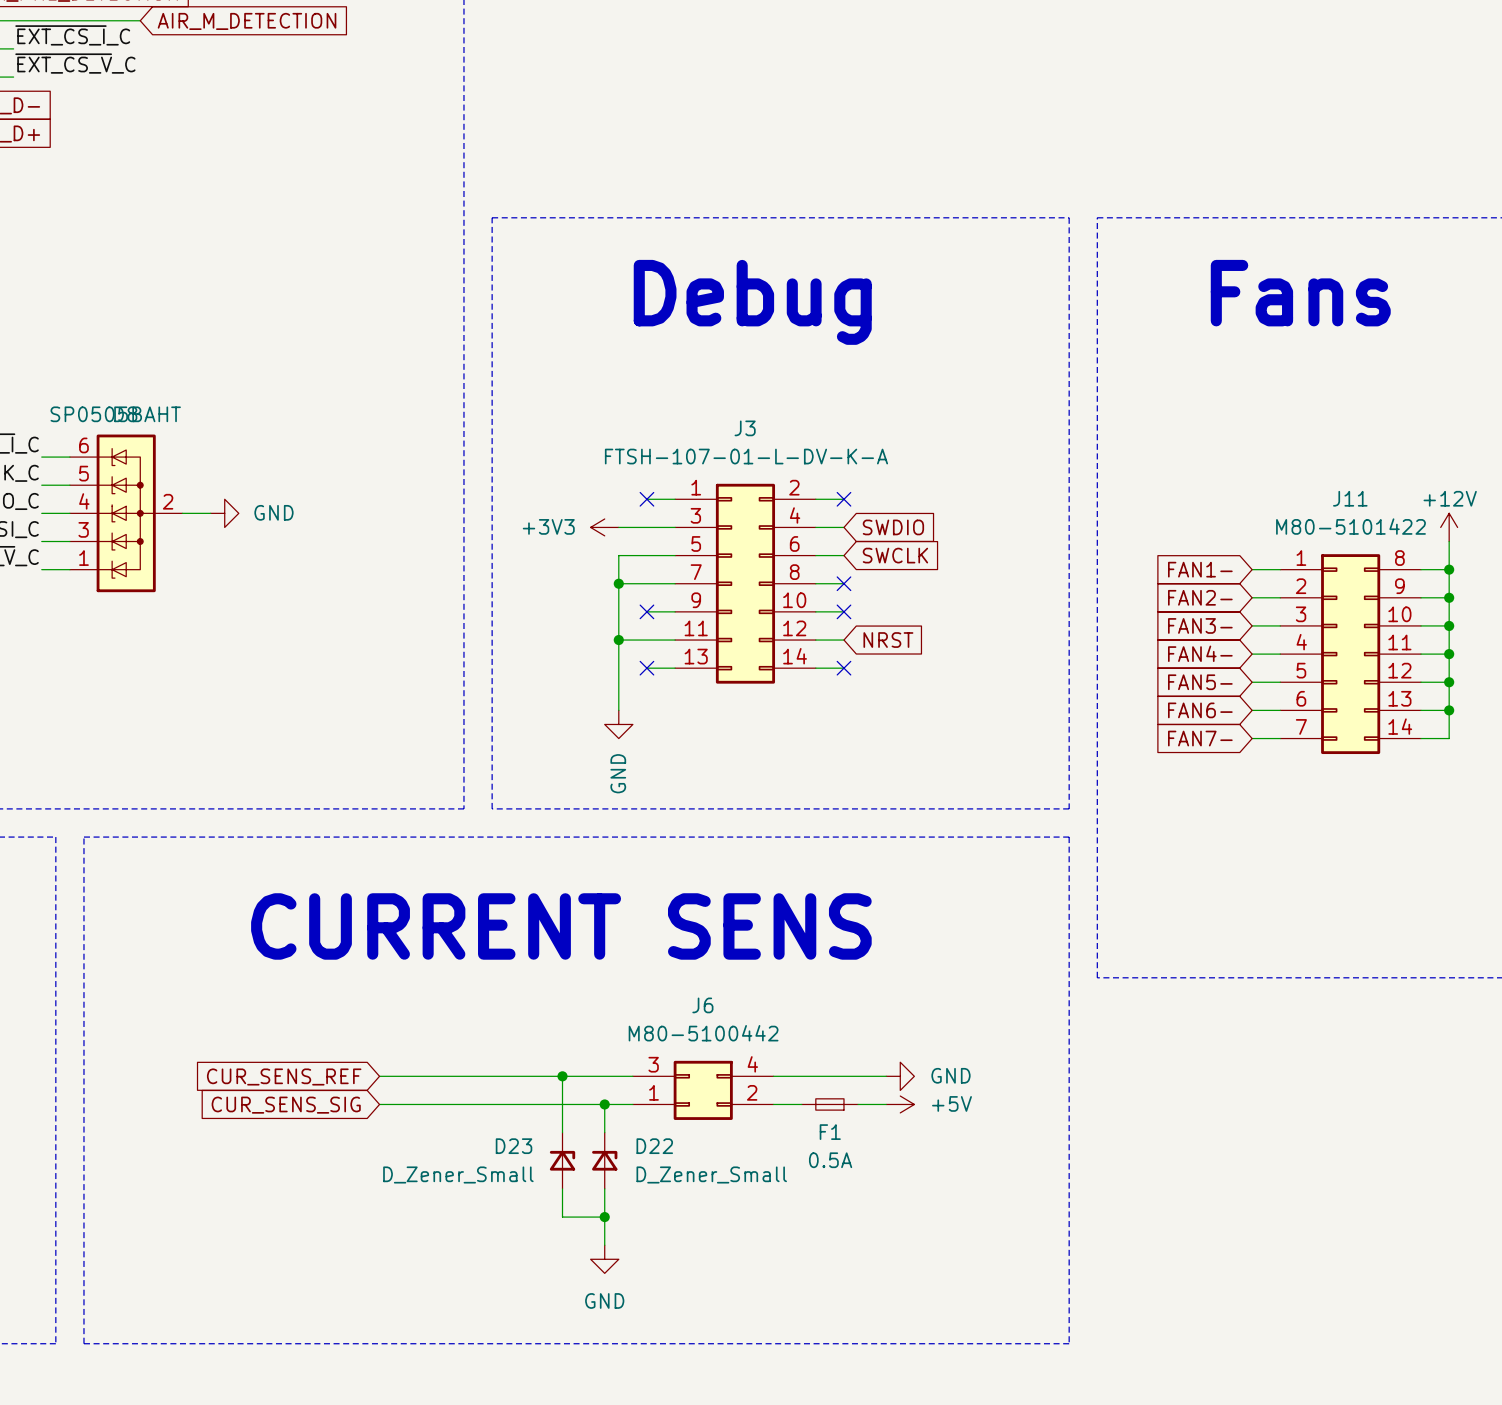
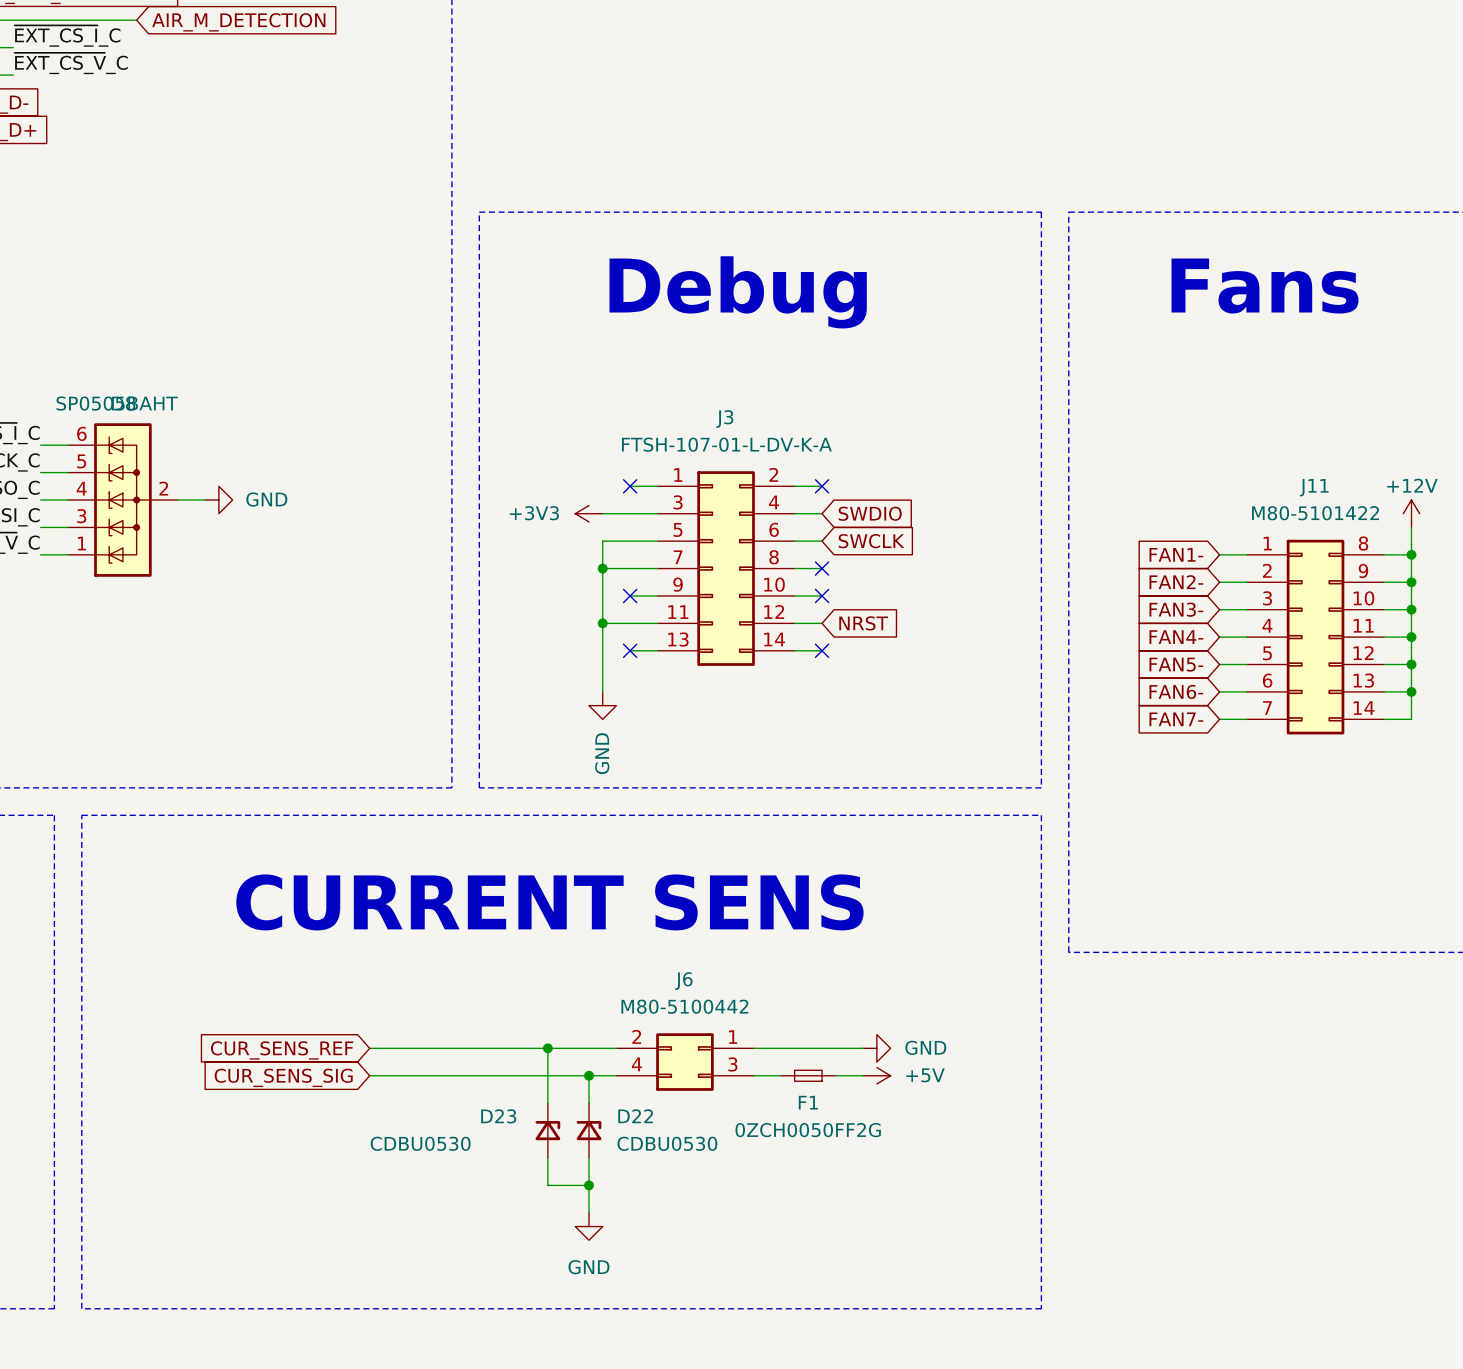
J6 rotation: 0° (703, 1090) -> 180° (684, 1062)
F1 value: 0.5A (830, 1160) -> 0ZCH0050FF2G (808, 1130)
D23 value: D_Zener_Small (458, 1174) -> CDBU0530 (420, 1143)
D22 value: D_Zener_Small (711, 1174) -> CDBU0530 (667, 1143)

